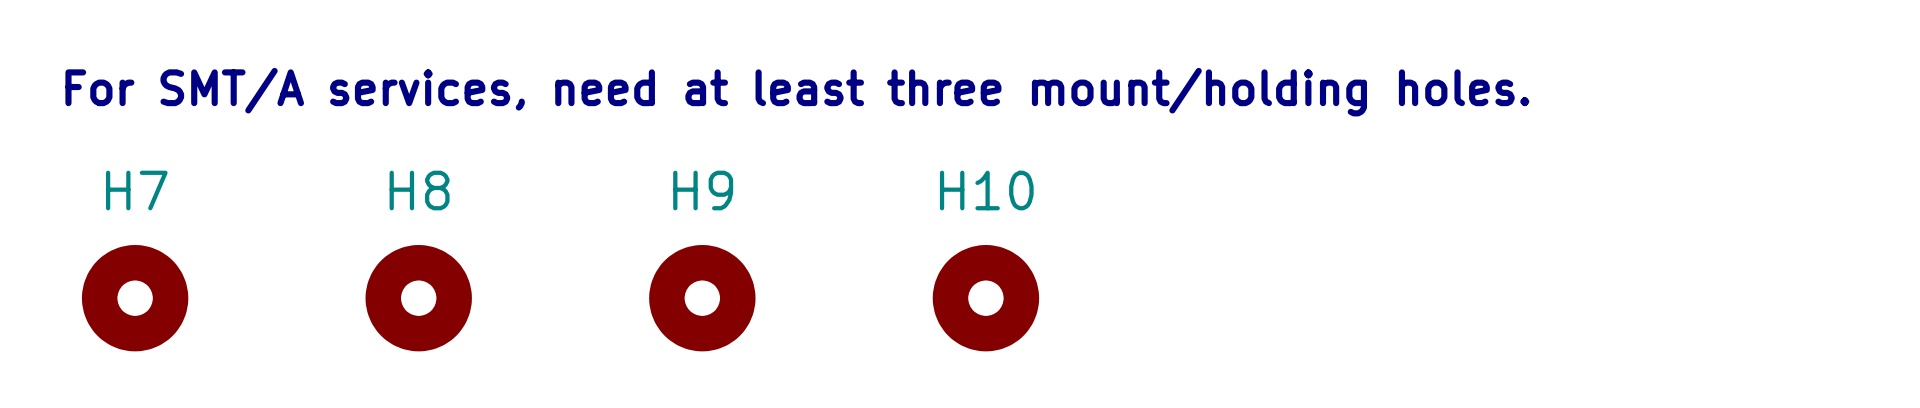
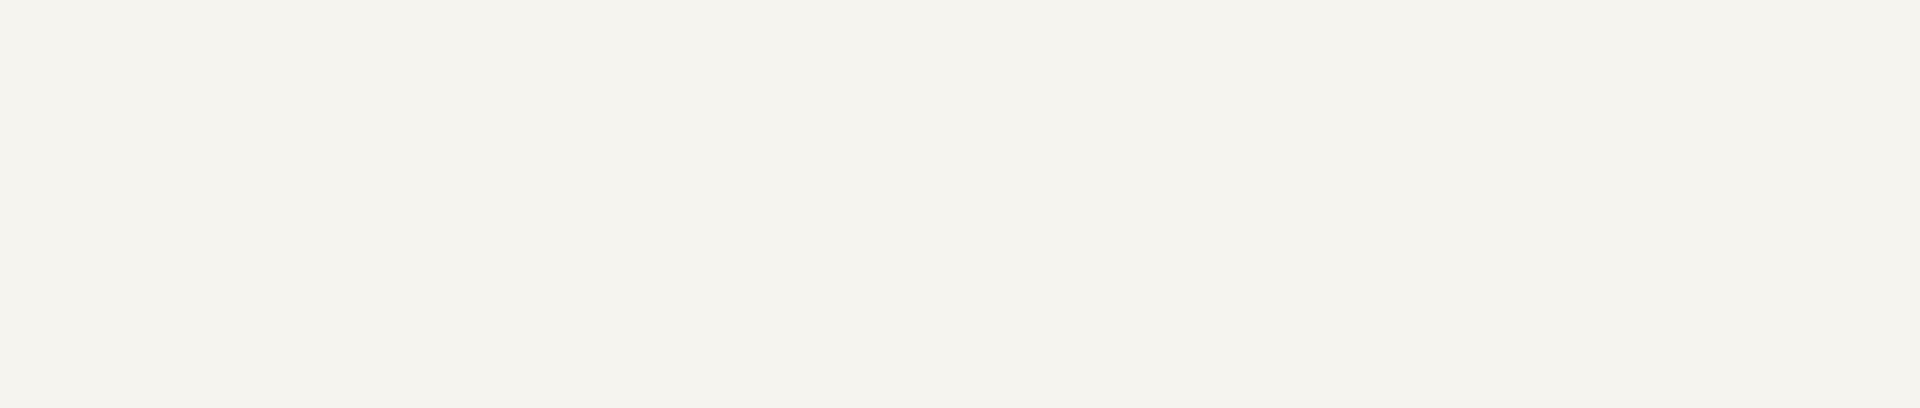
text: For SMT/A services, need at least three mount/holding holes. (797, 92) -> none
H7: (135, 298) -> none
H8: (418, 298) -> none
H9: (702, 298) -> none
H10: (985, 298) -> none

